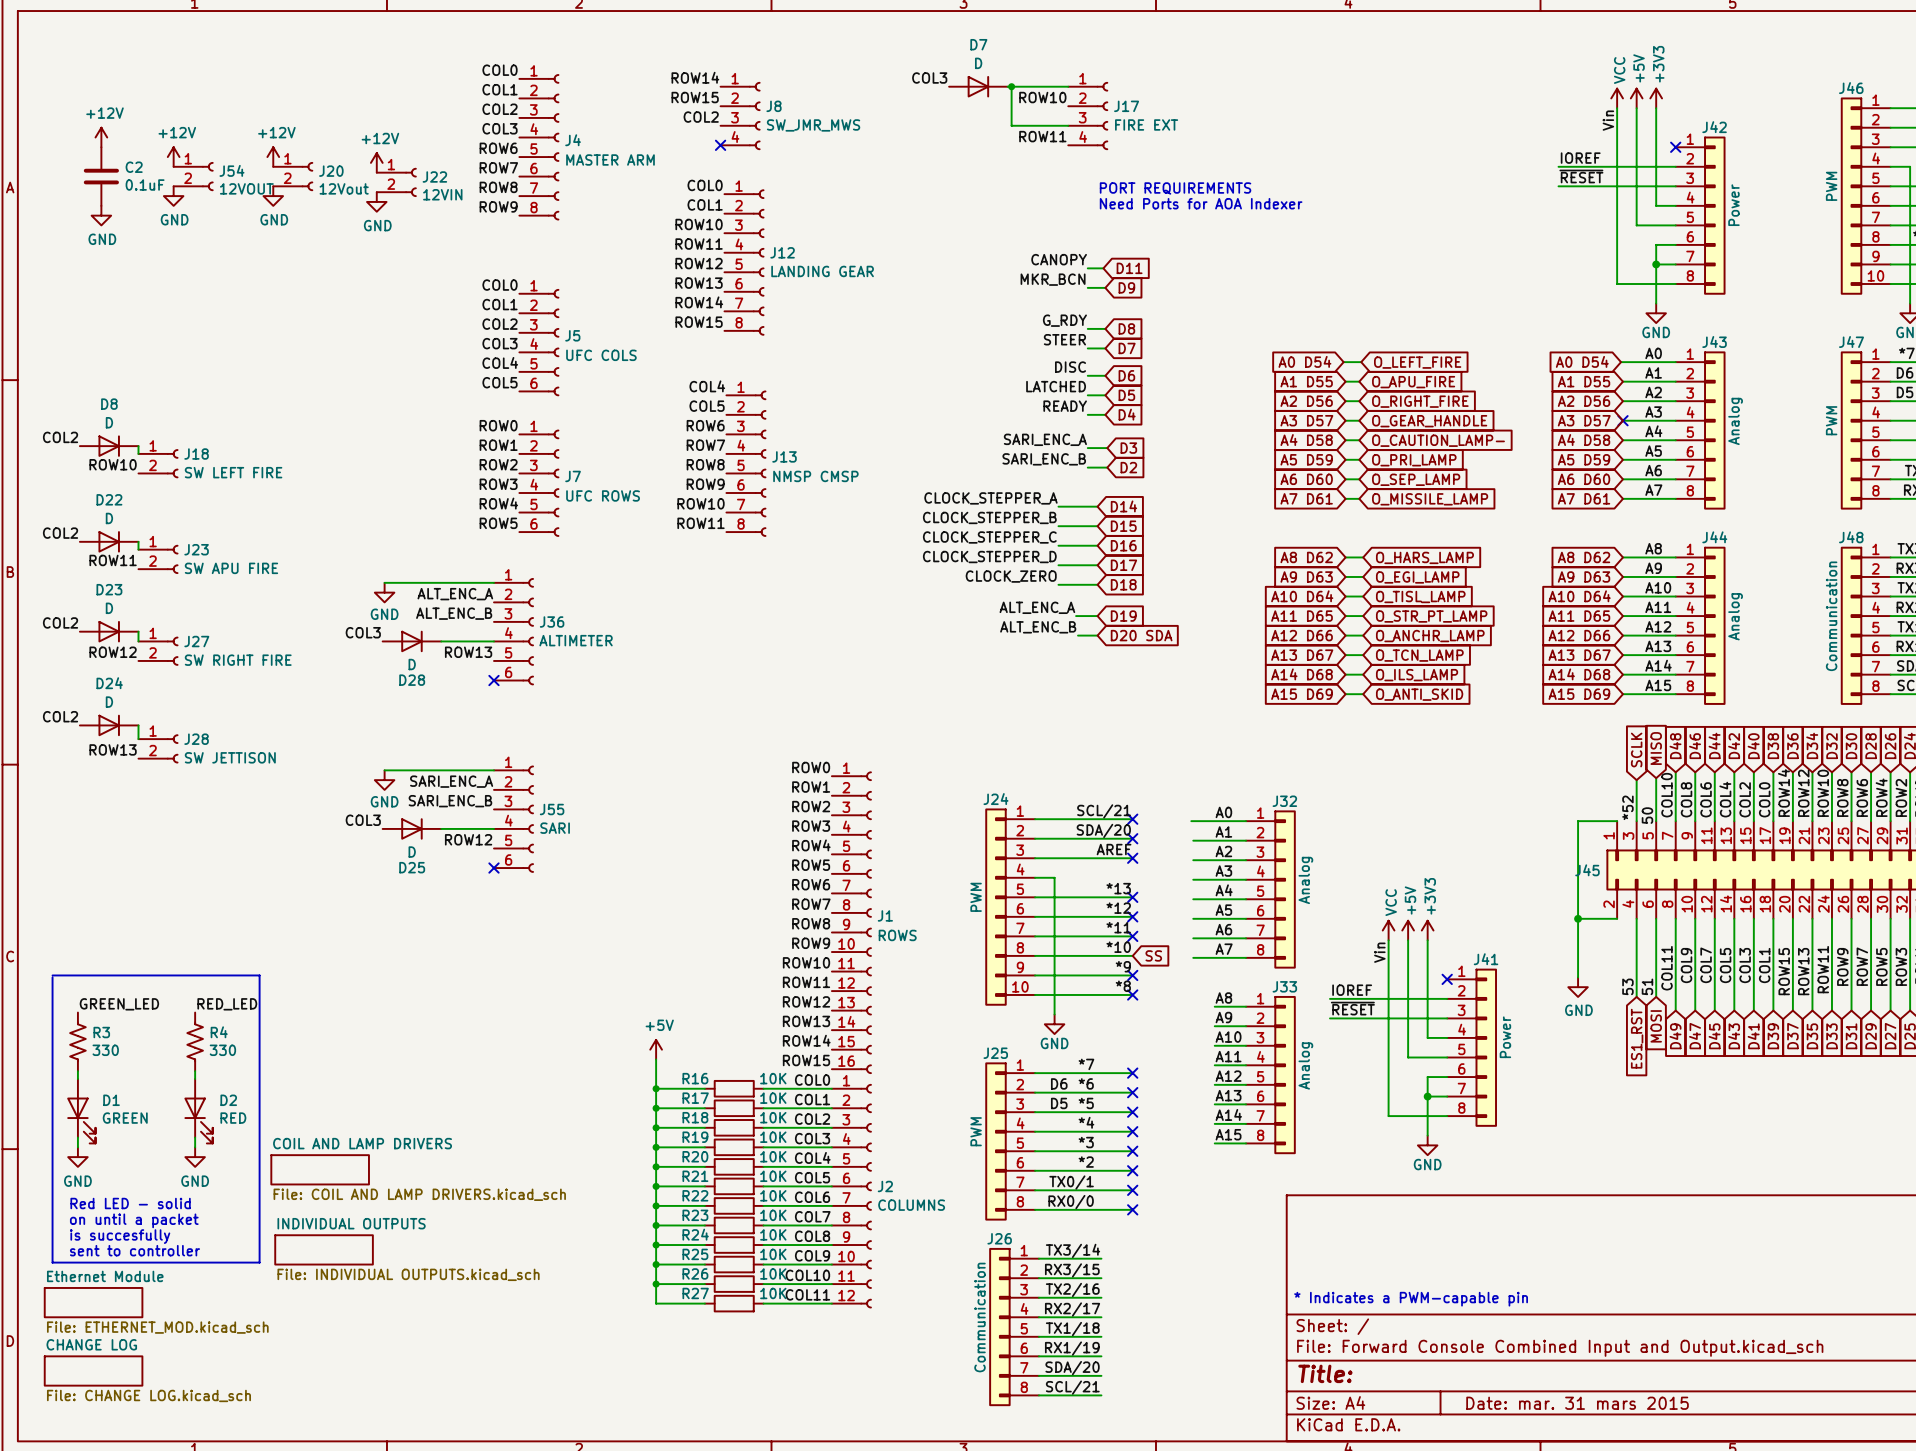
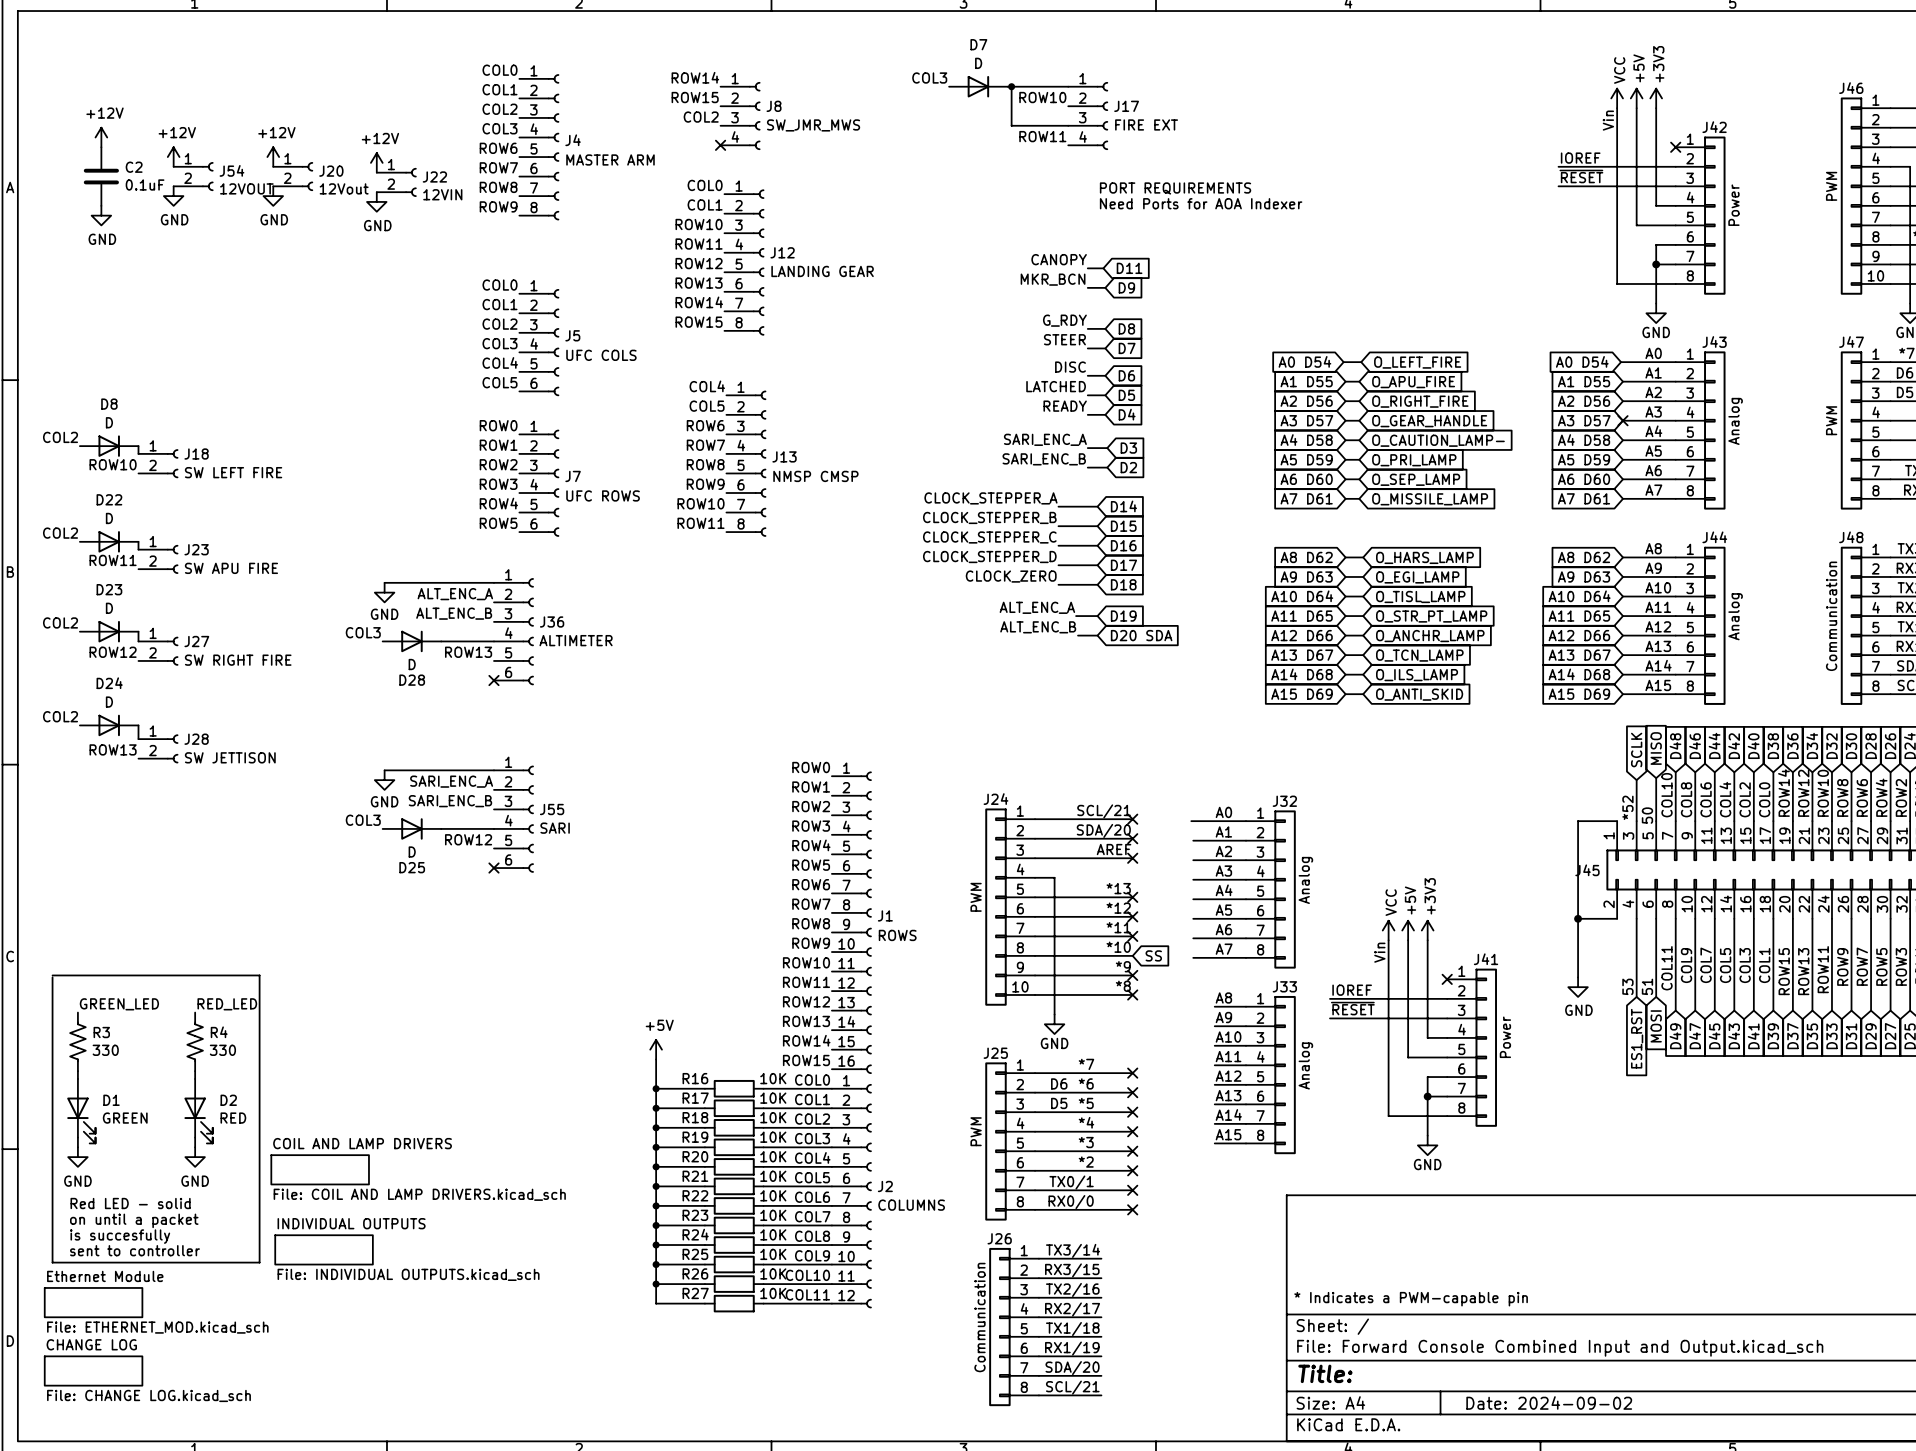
title block: Date: mar. 31 mars 2015 (1577, 1403) -> Date: 2024-09-02 (1549, 1402)

